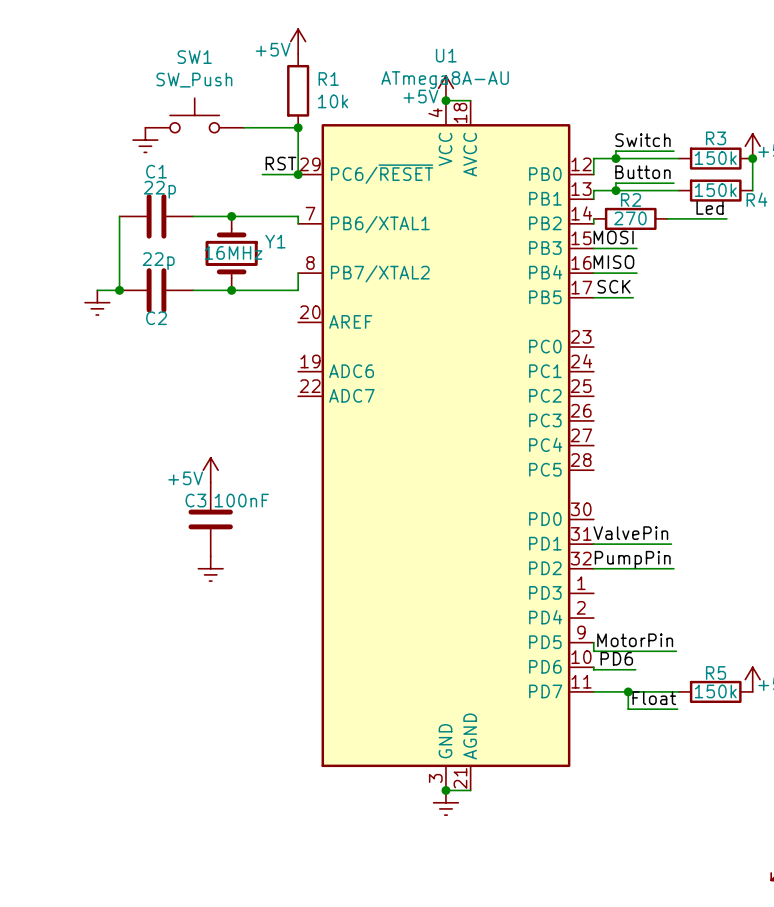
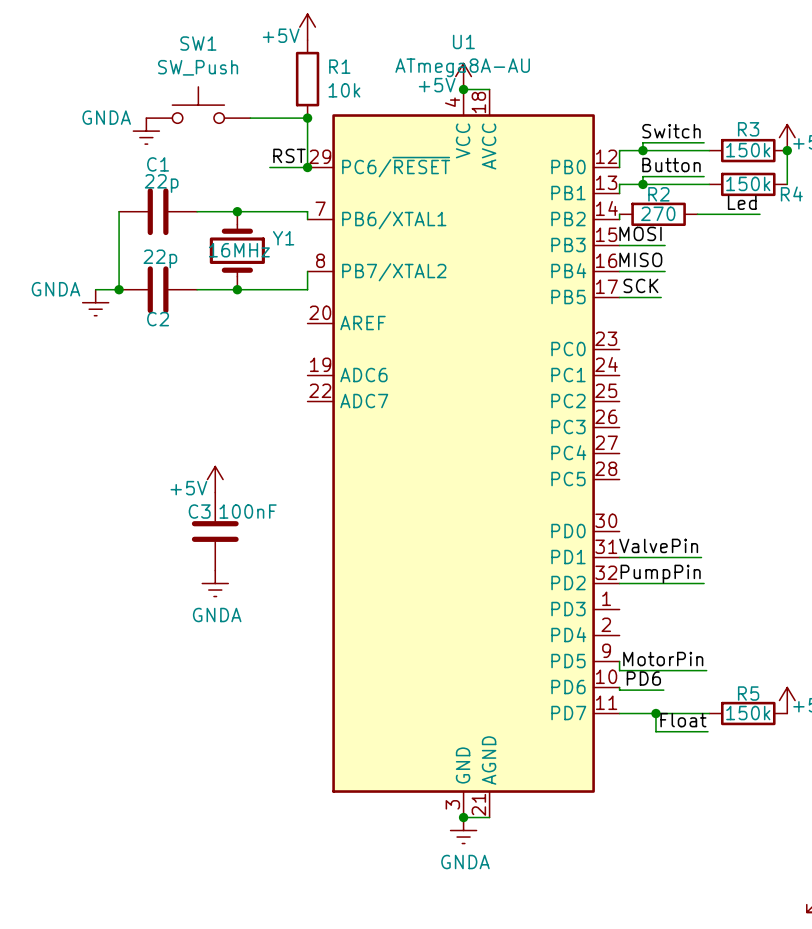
power symbol text: none -> GNDA (106, 117)
power symbol text: none -> GNDA (55, 289)
power symbol text: none -> GNDA (217, 615)
power symbol text: none -> GNDA (465, 862)

